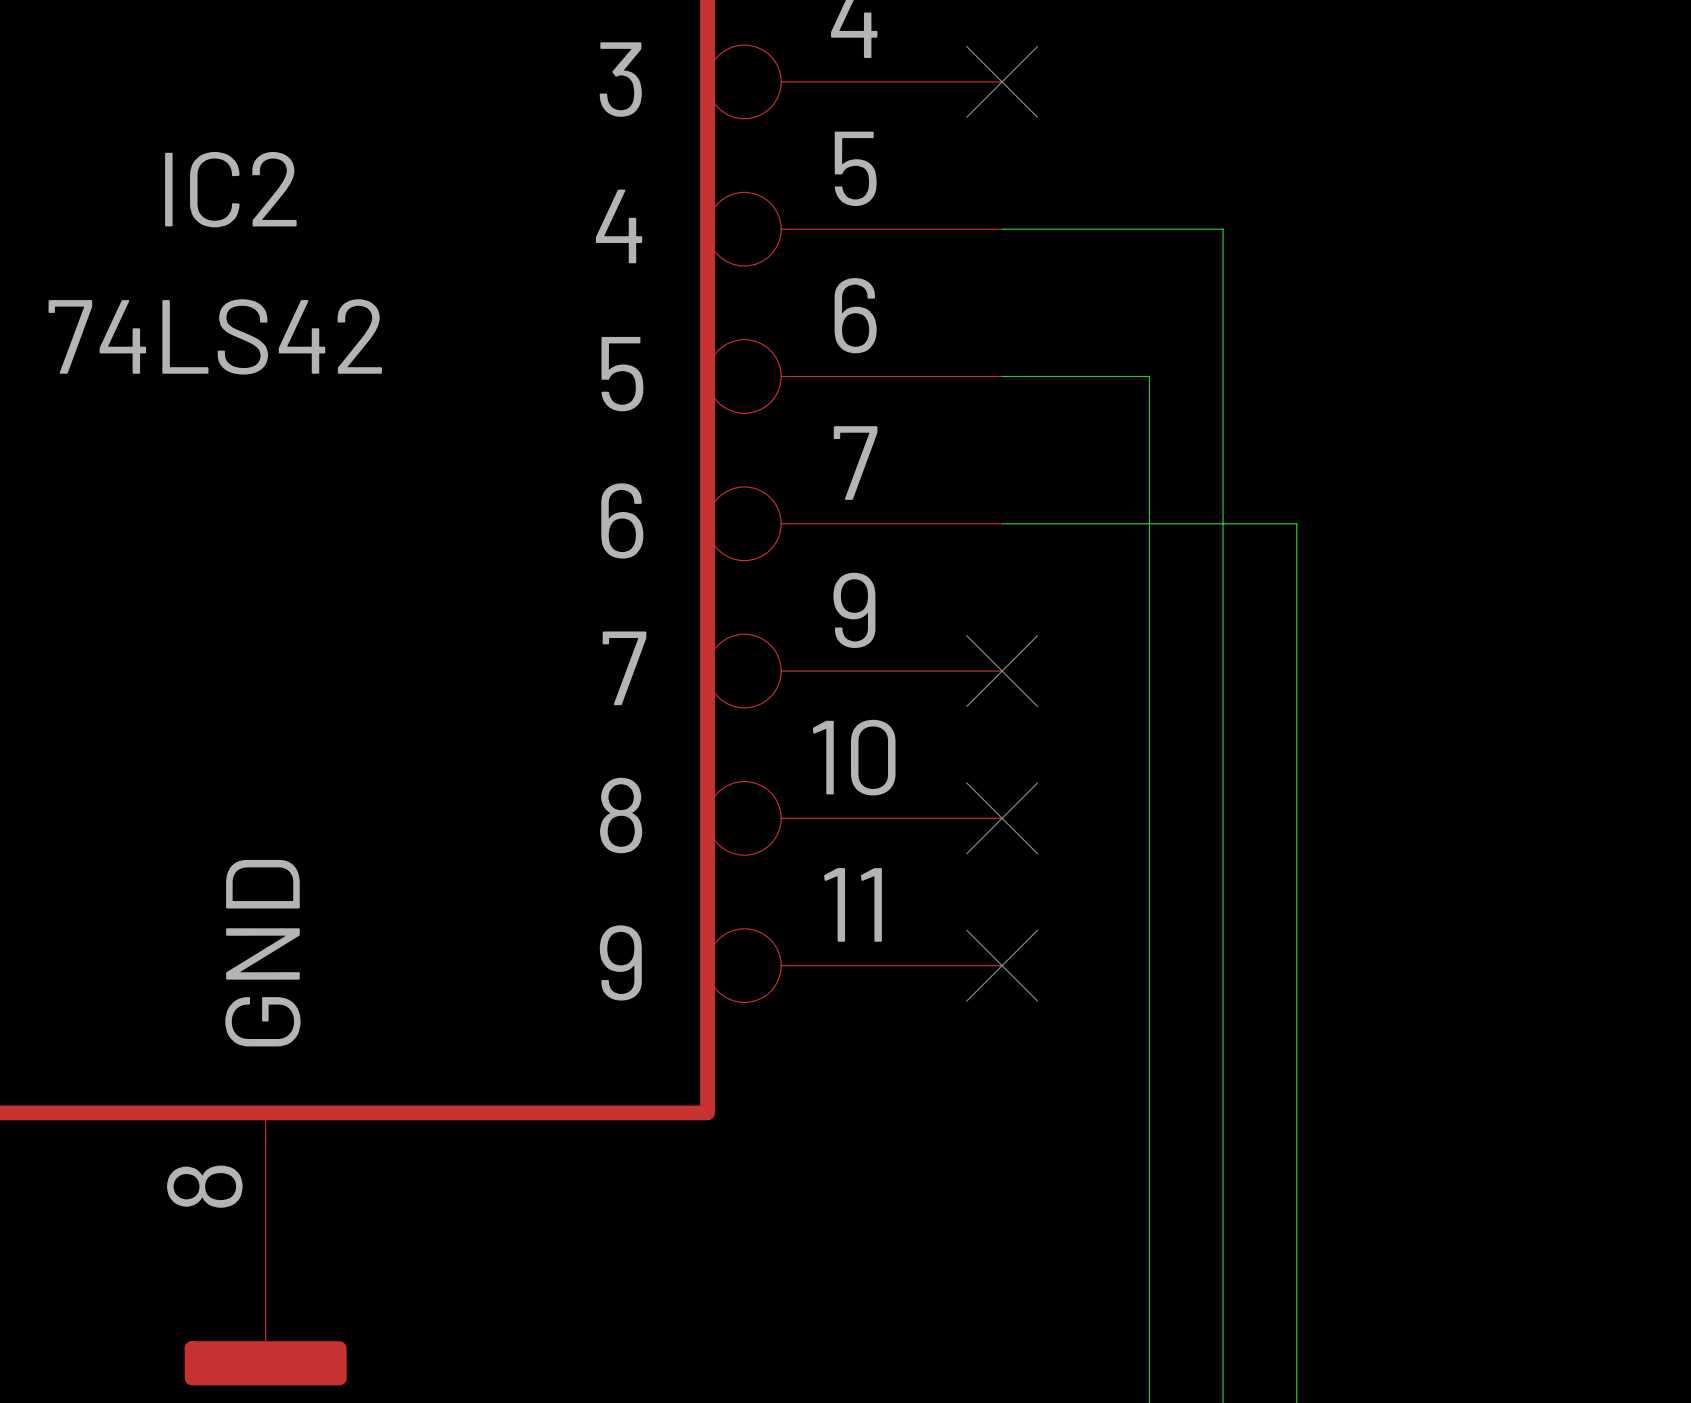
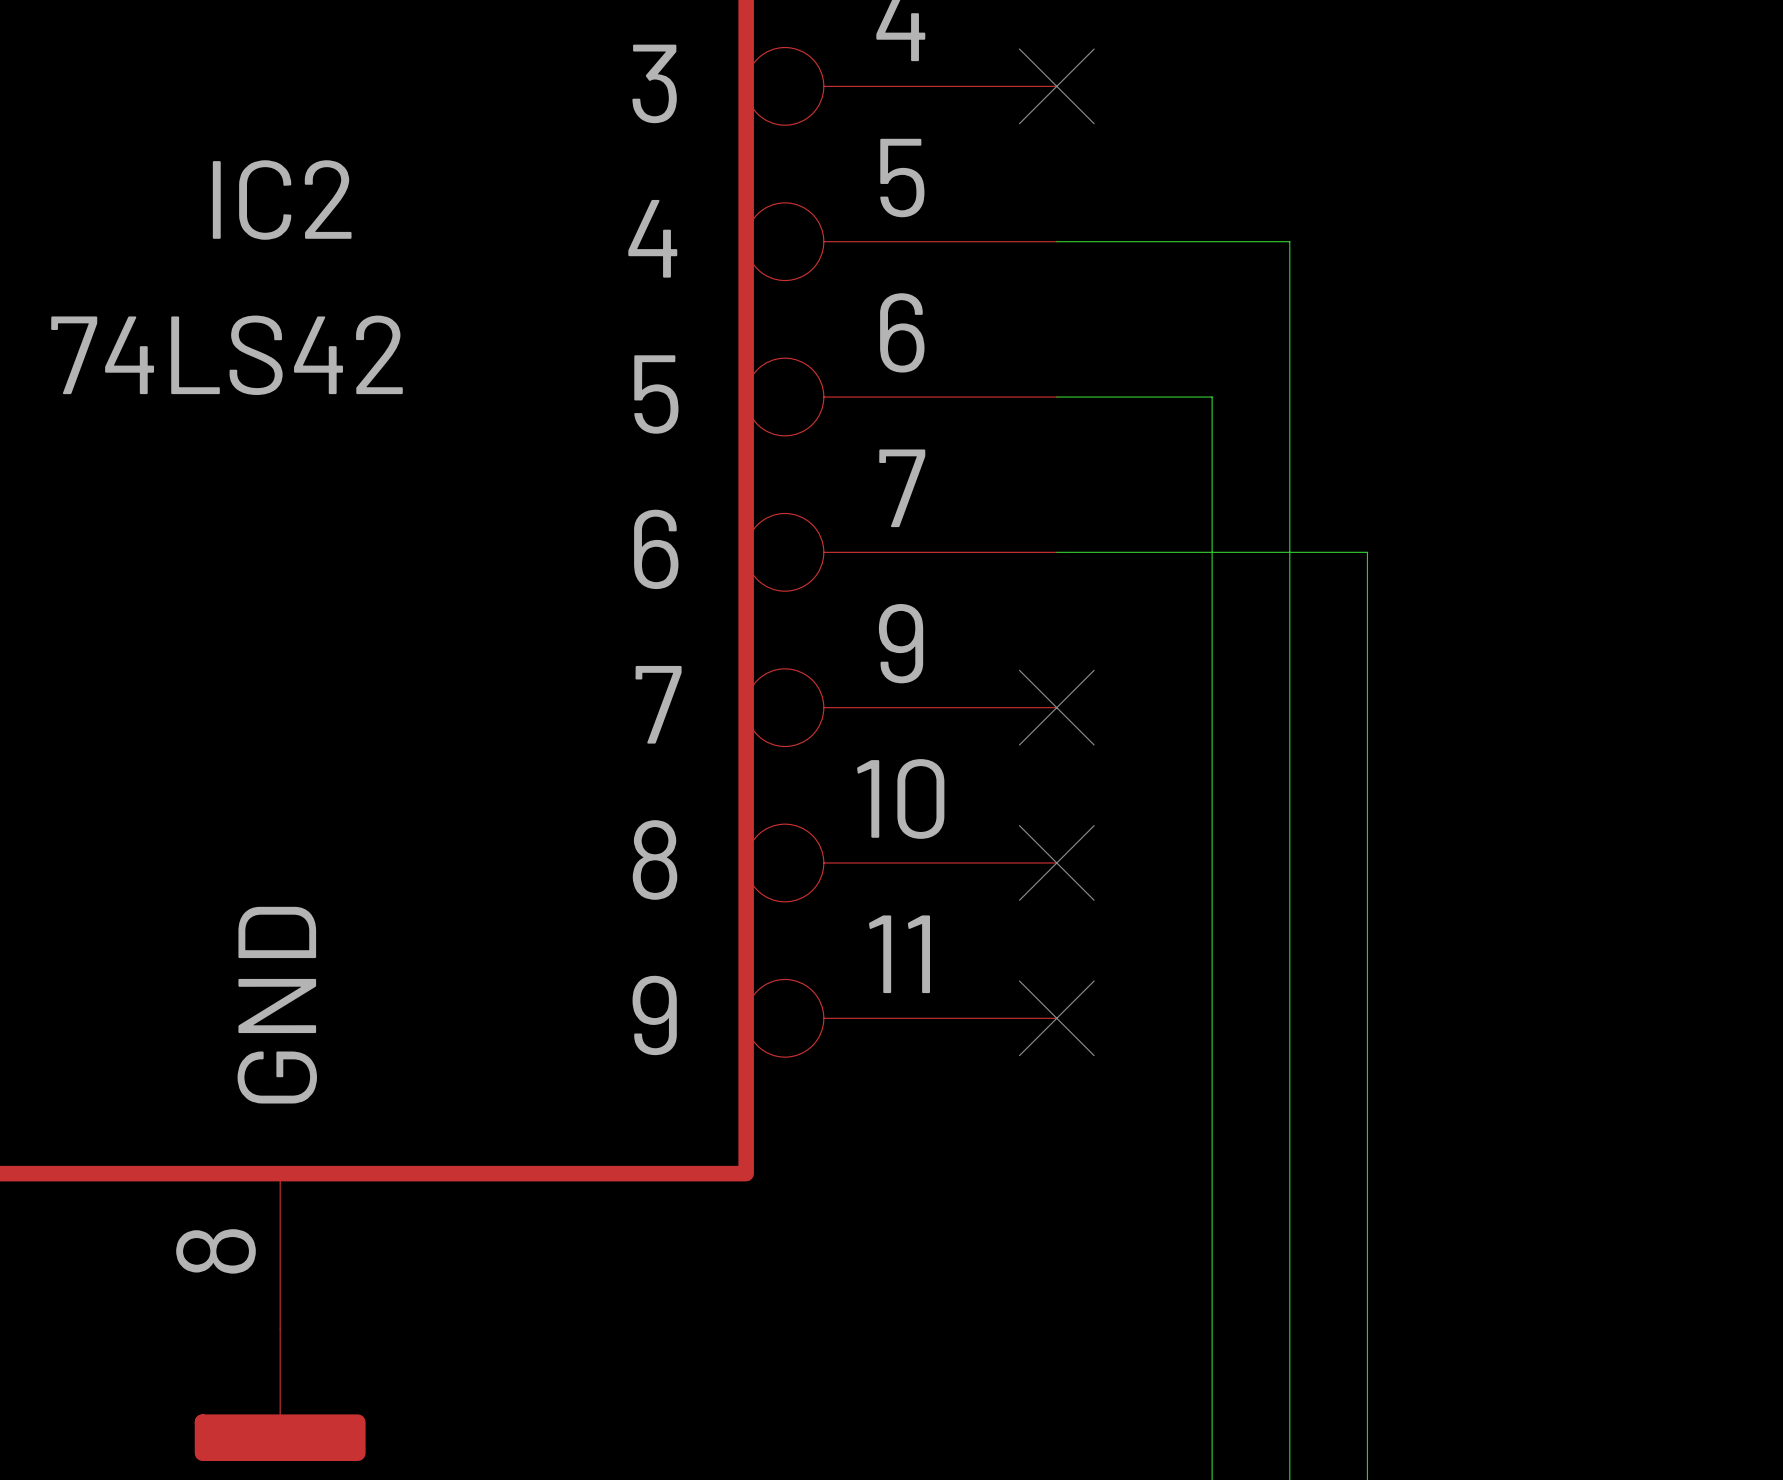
IC2 name position: IC2 (230, 189) -> IC2 (282, 200)

